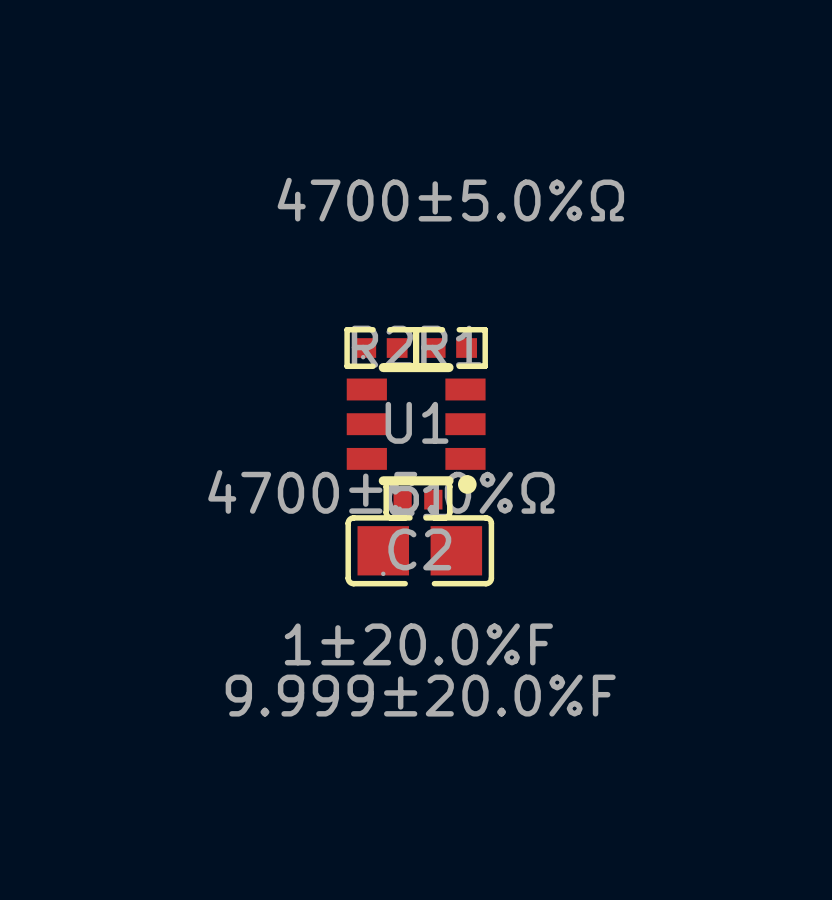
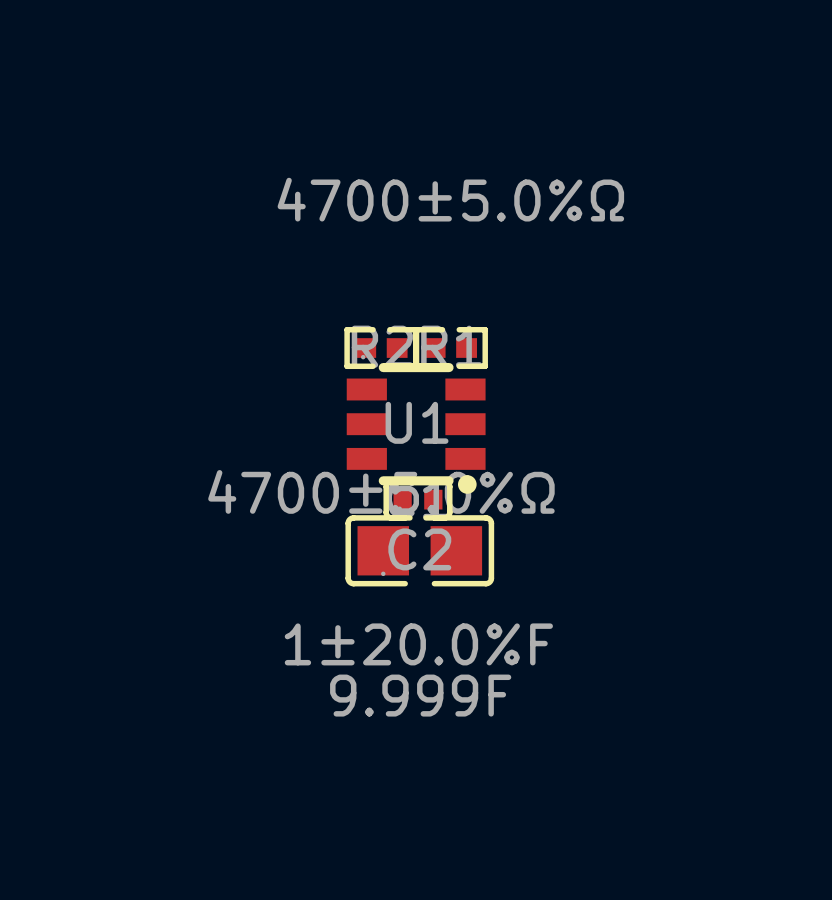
C2 value: 9.999±20.0%F (420, 695) -> 9.999F (420, 695)

